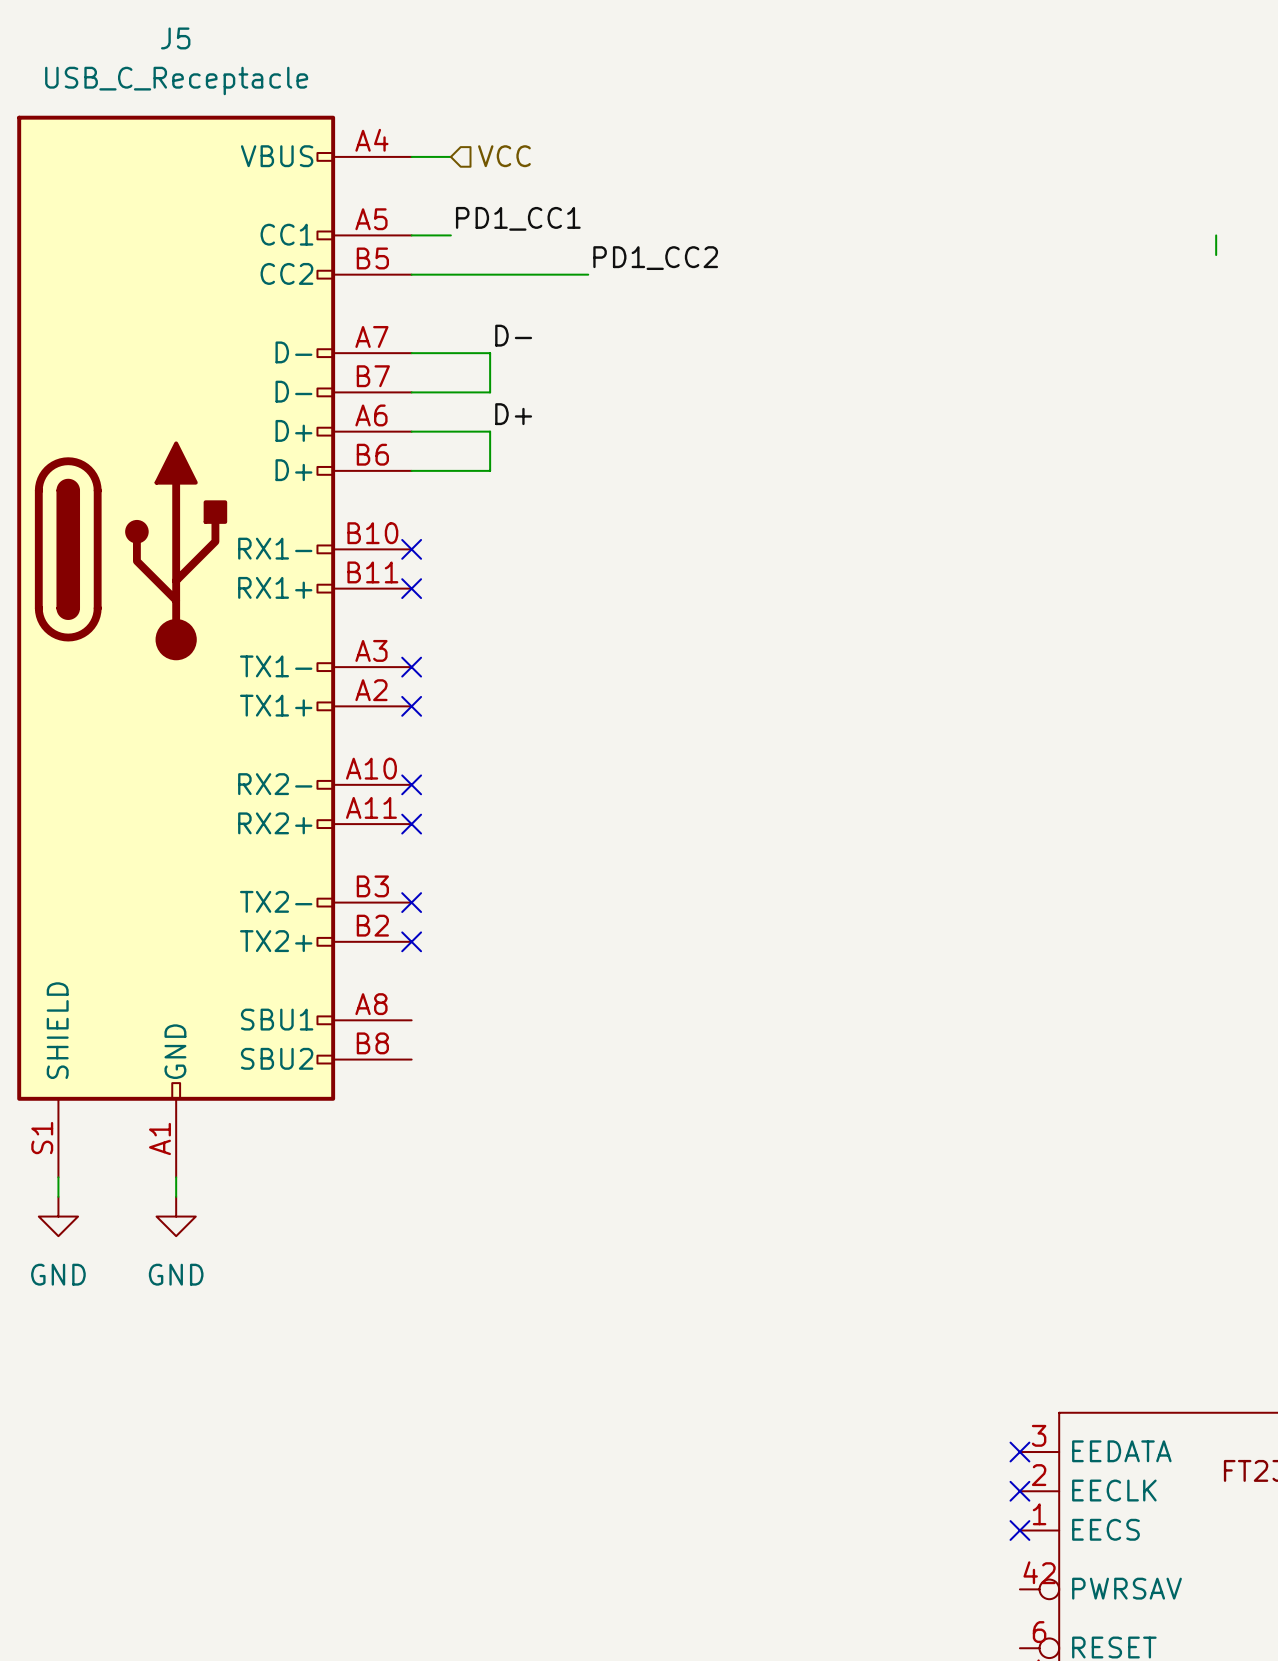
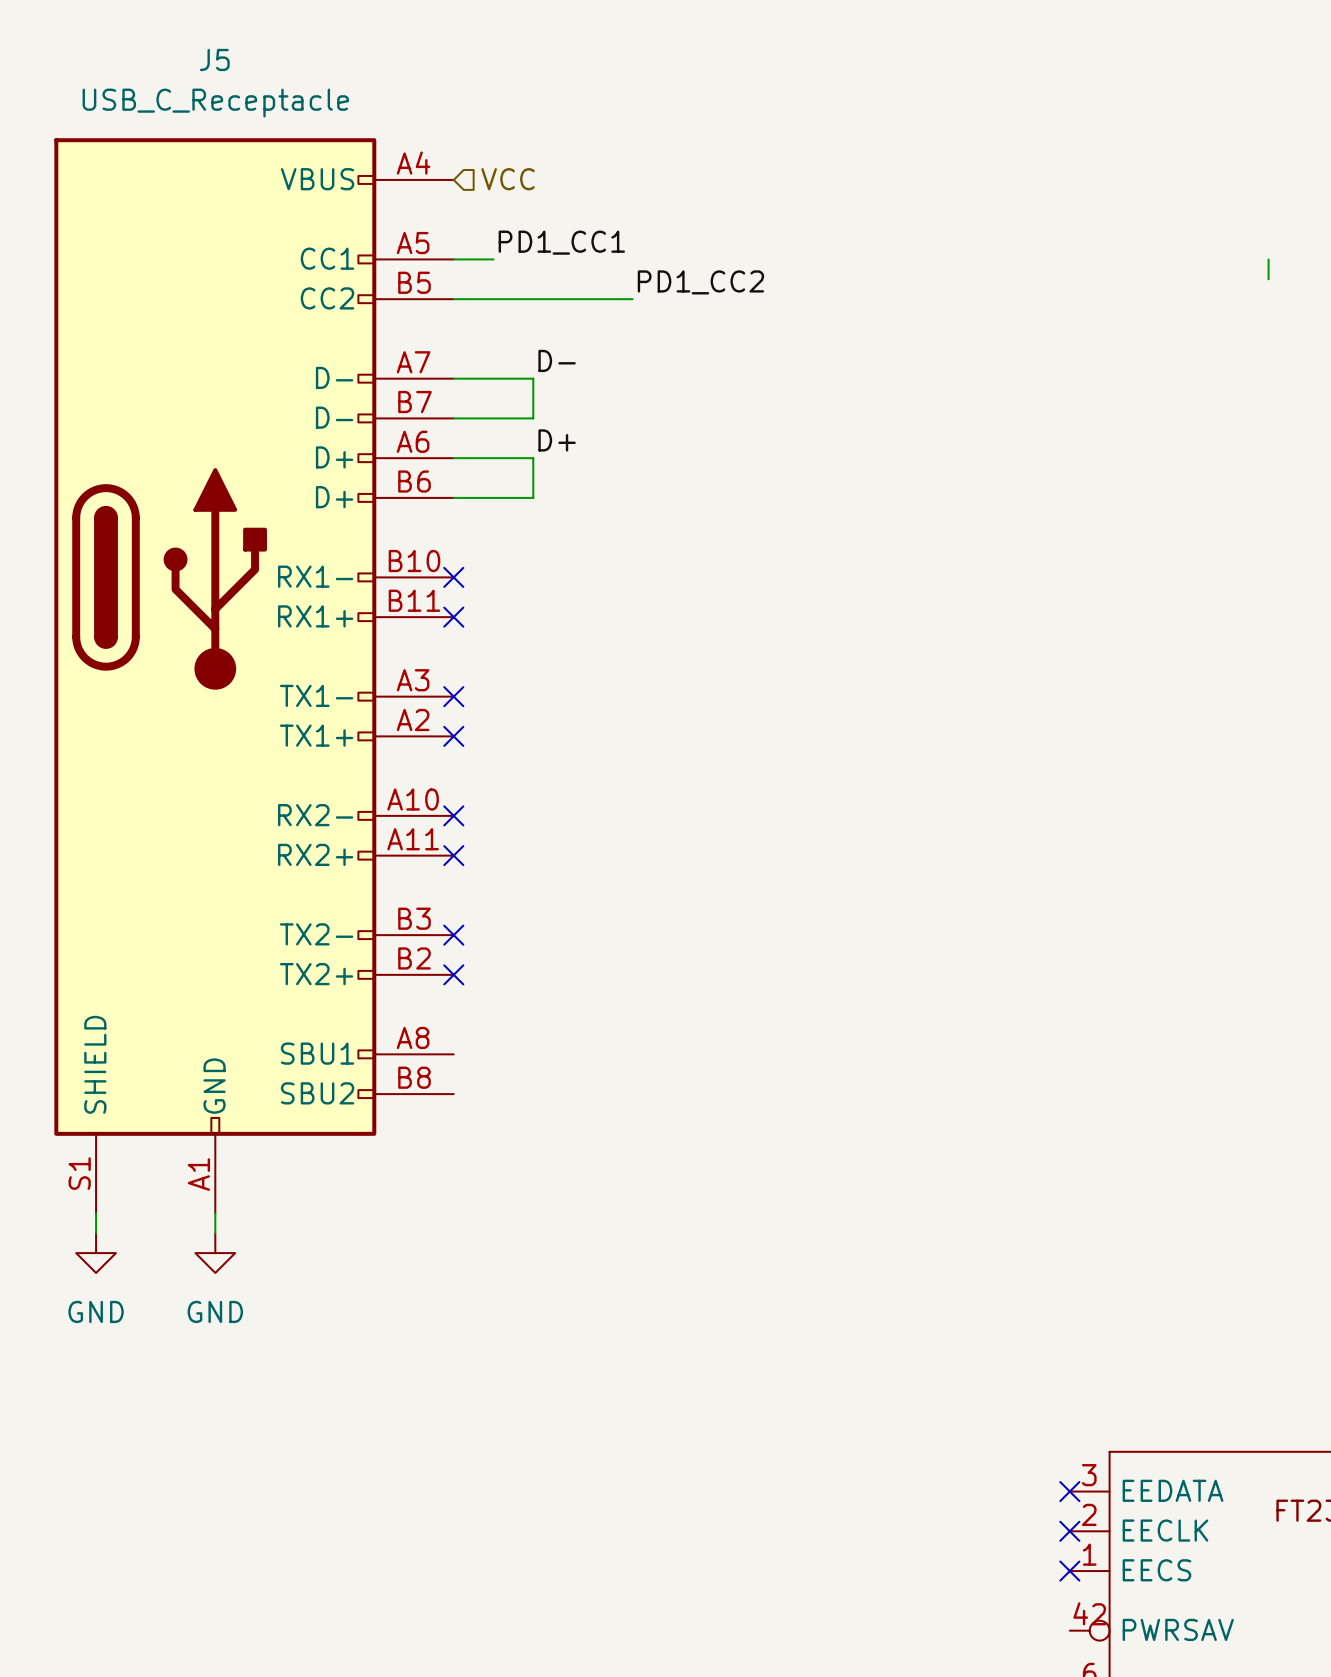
wire: (411, 156) (450, 156) -> none
hierarchical label position: VCC (504, 156) -> VCC (508, 179)

